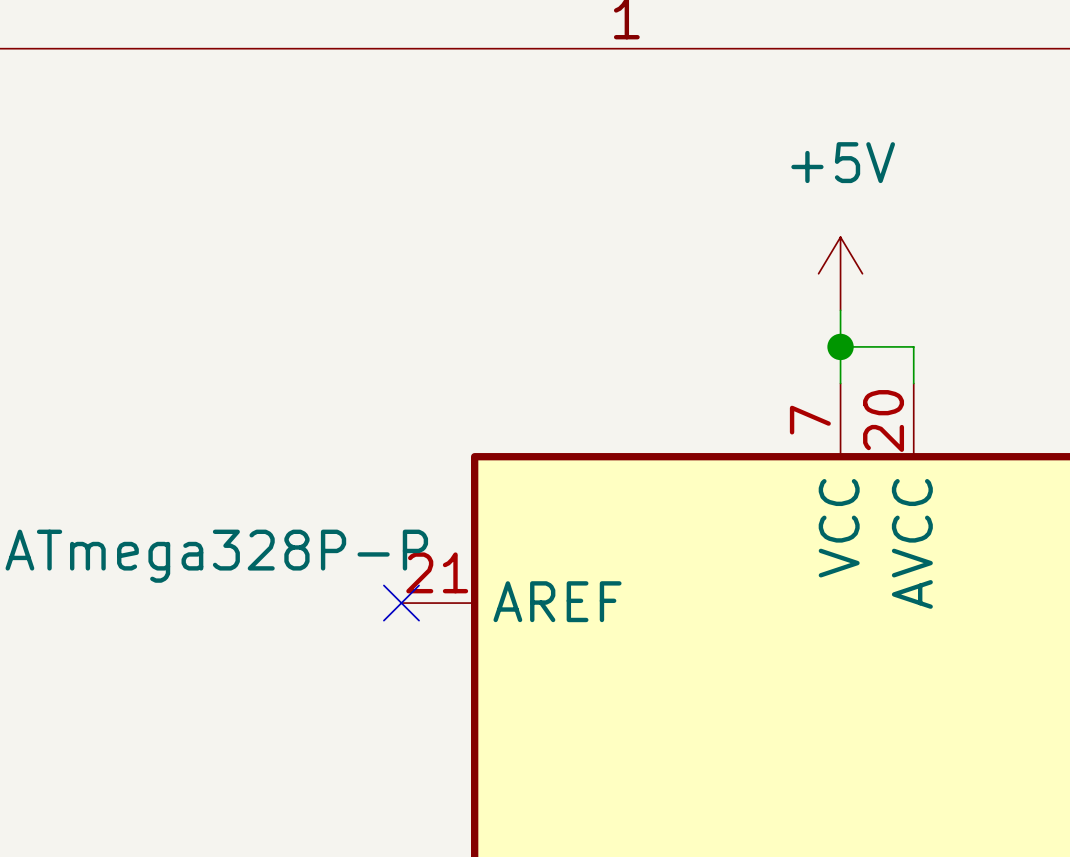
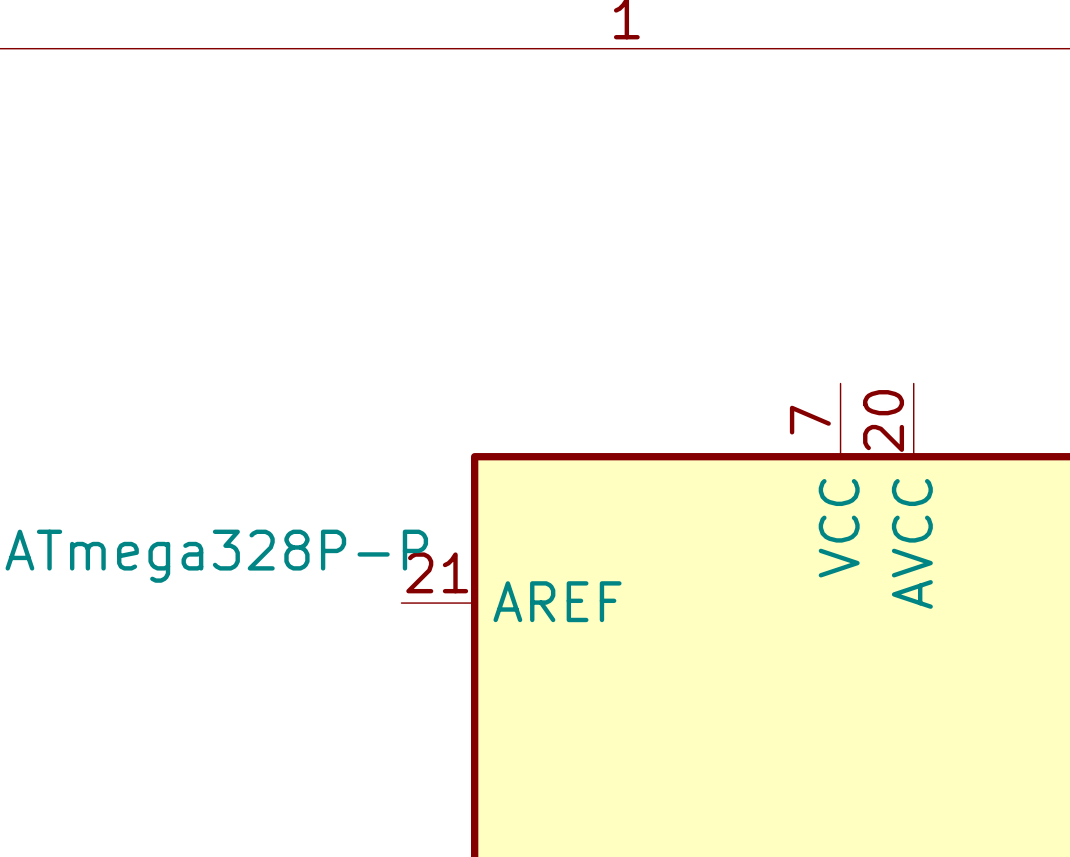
power symbol: +5V (840, 273) -> none
wire: (840, 310) (840, 383) -> none
wire: (840, 346) (913, 346) (913, 383) -> none
junction: (840, 346) -> none
no-connect mark: (401, 603) -> none

